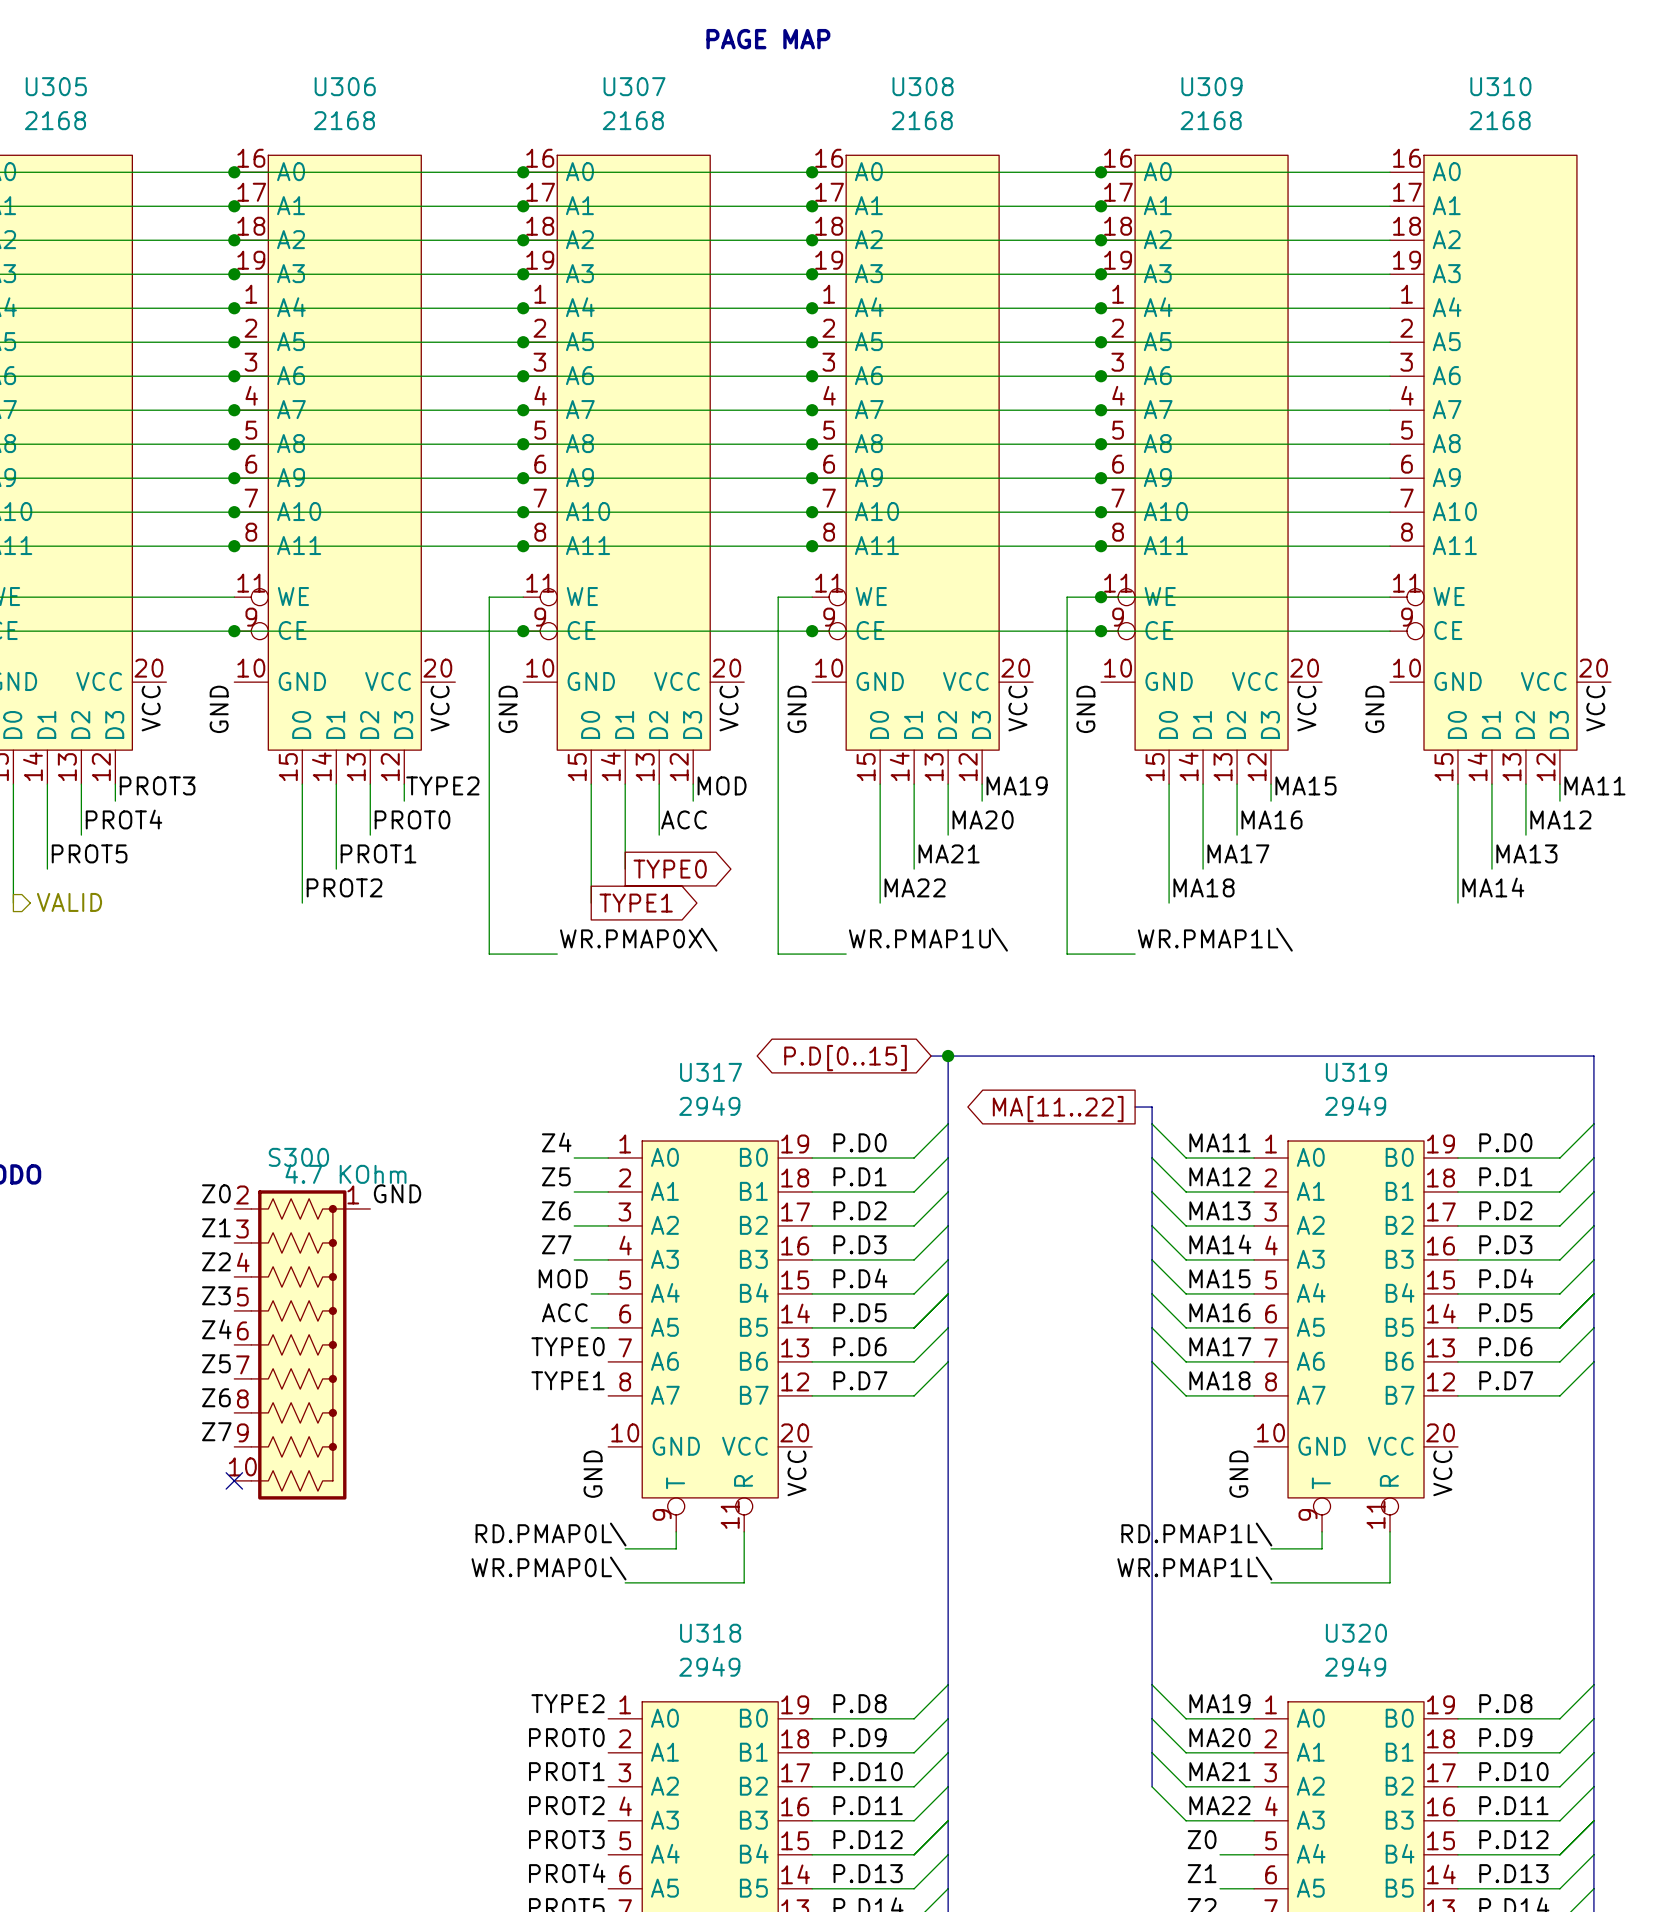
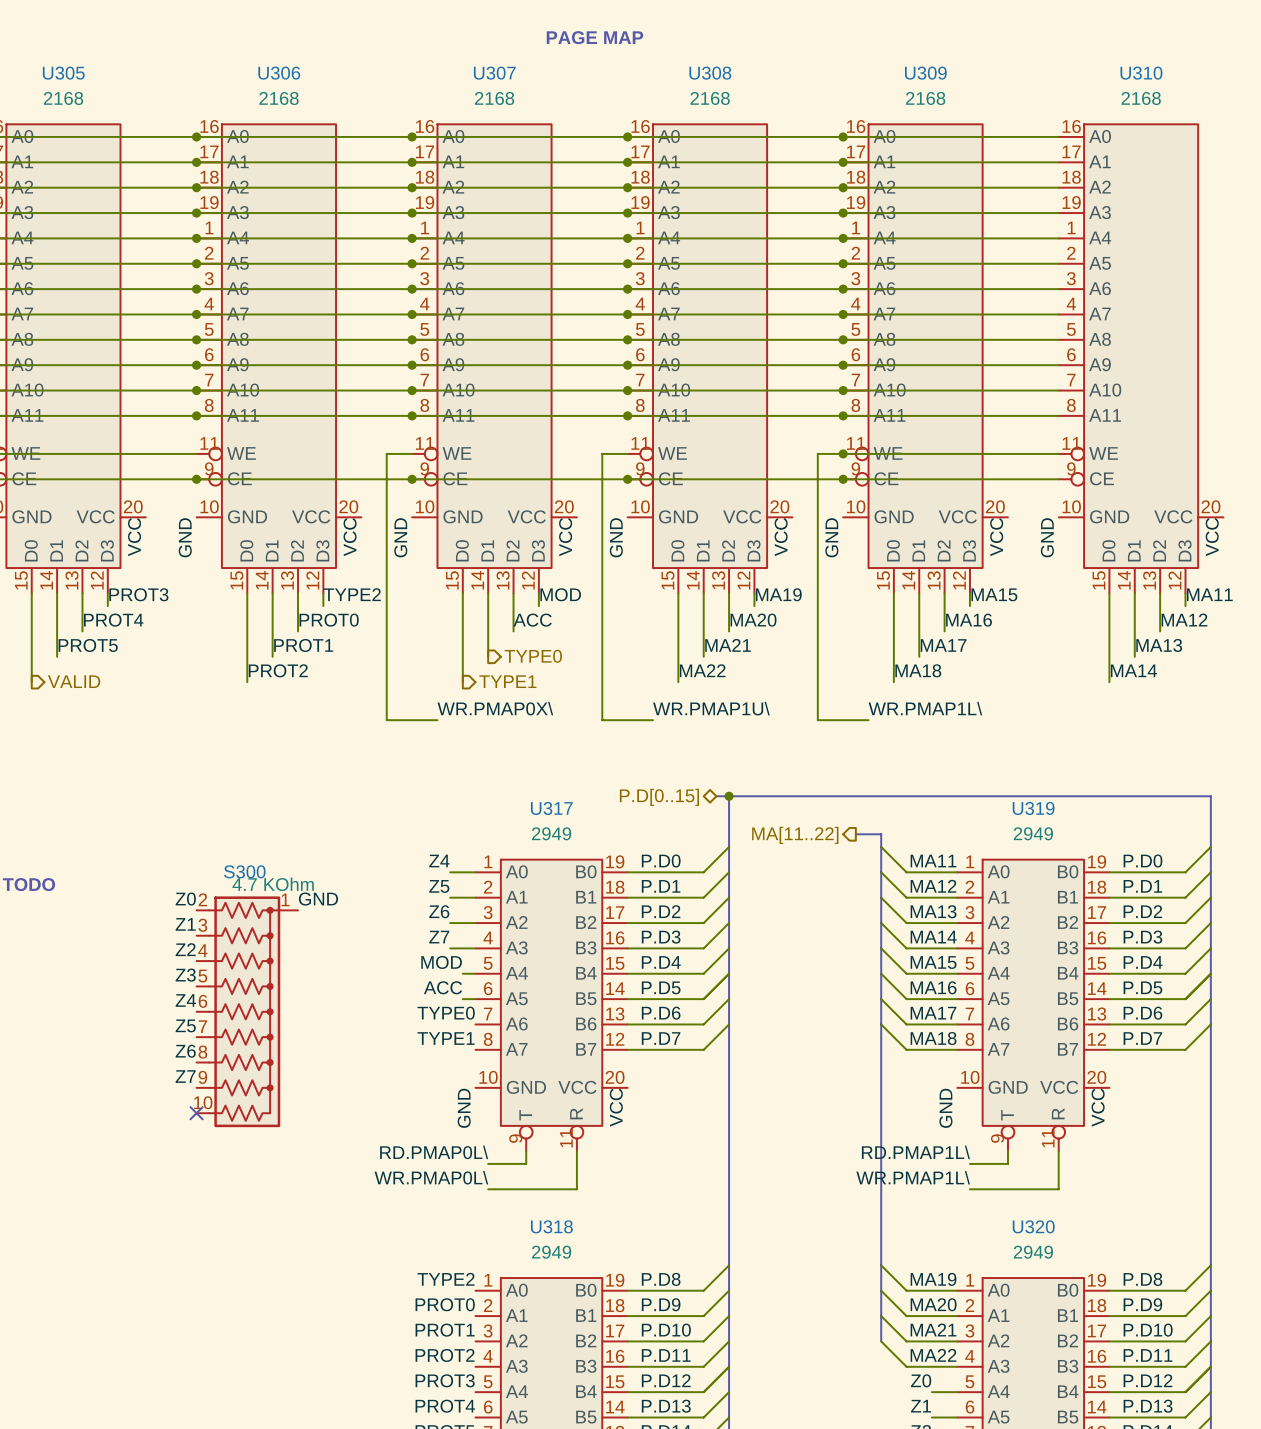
hierarchical label: none -> TYPE0 (533, 656)
global label: TYPE0 (670, 869) -> none
hierarchical label: none -> TYPE1 (507, 681)
global label: TYPE1 (636, 903) -> none
hierarchical label: none -> P.D[0..15] (659, 797)
global label: P.D[0..15] (845, 1058) -> none
bus: none -> (855, 834) (868, 834)
hierarchical label: none -> MA[11..22] (795, 835)
global label: MA[11..22] (1058, 1109) -> none

